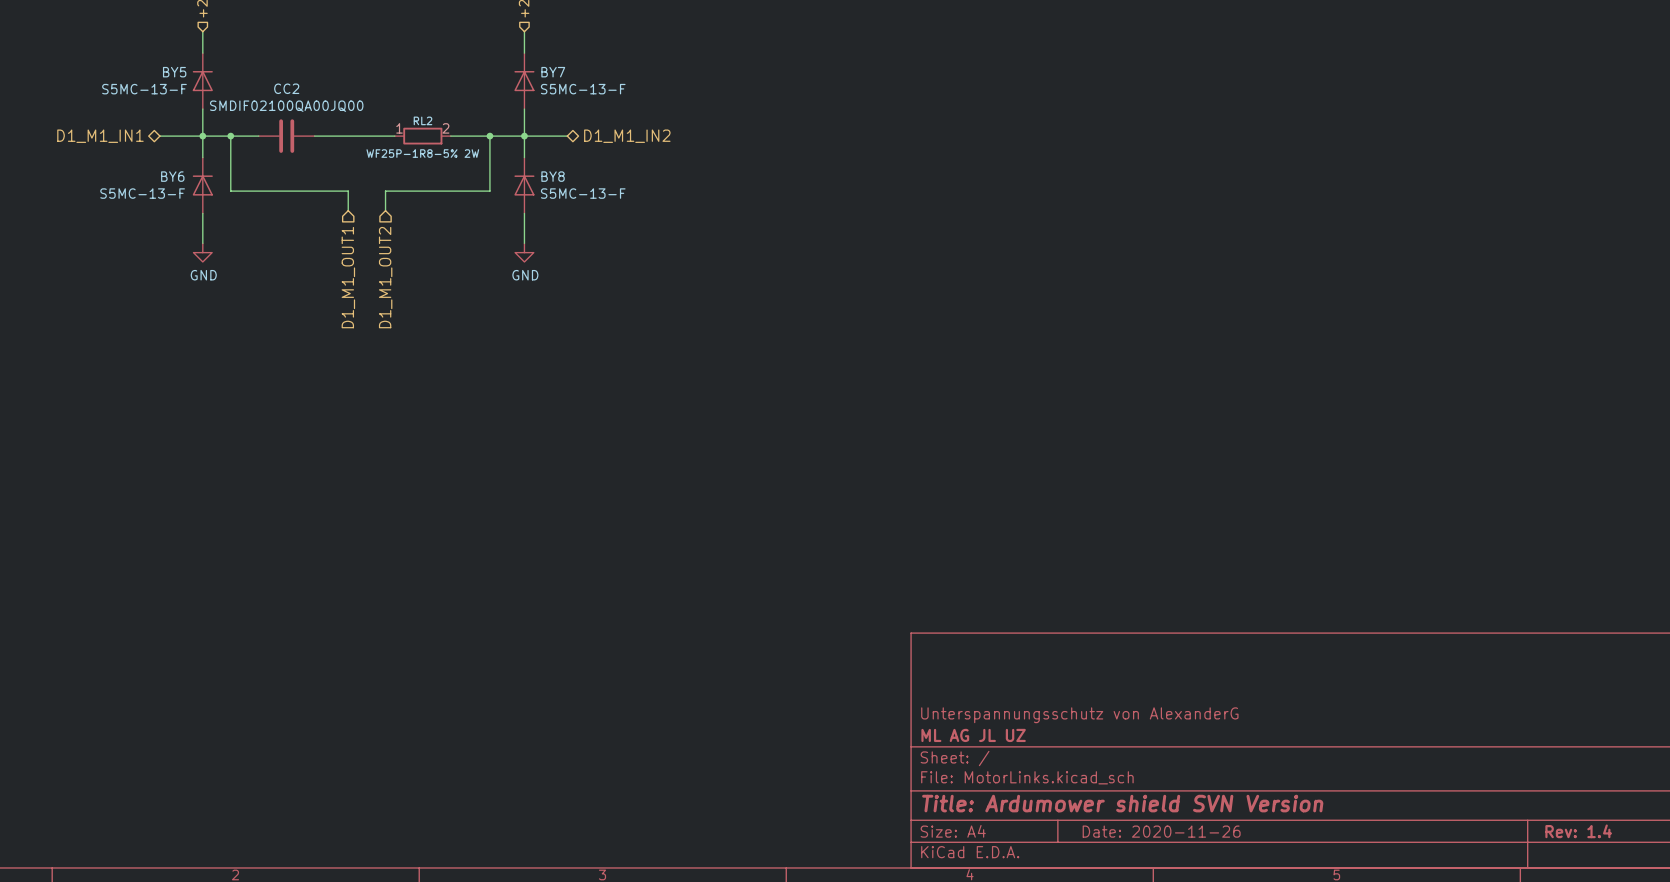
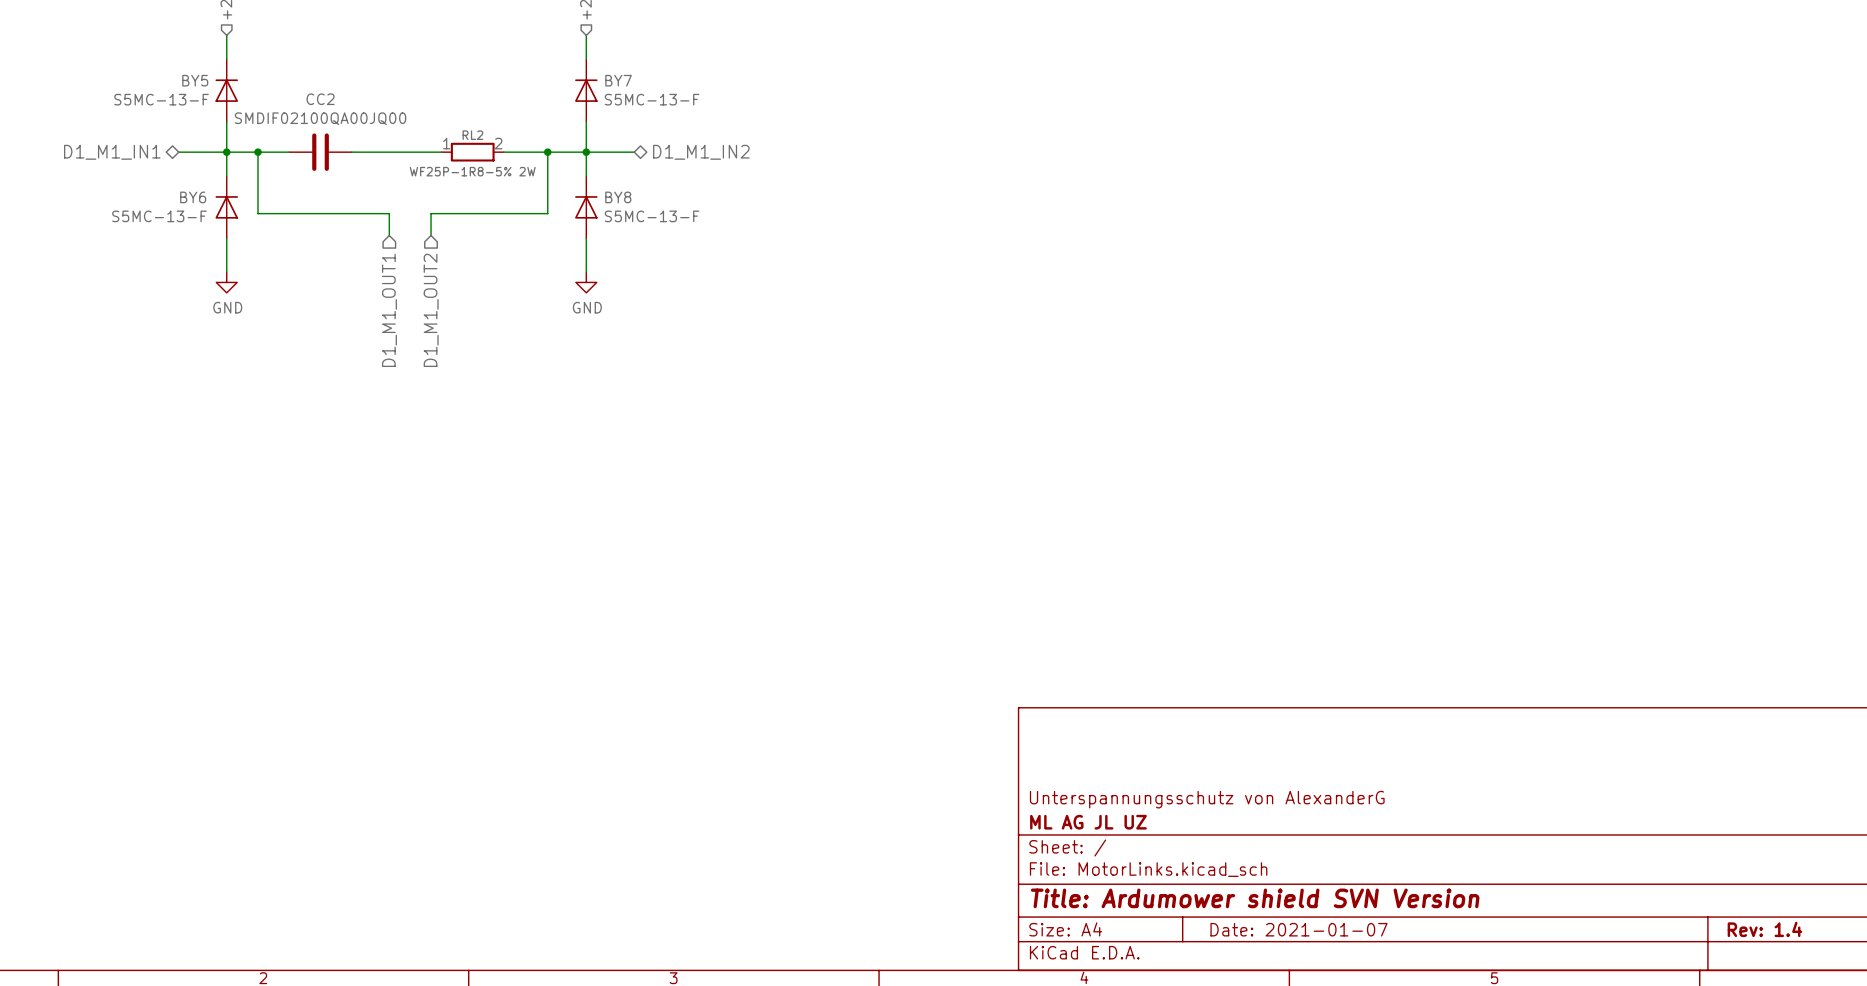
title block: Date: 2020-11-26 (1161, 831) -> Date: 2021-01-07 (1298, 929)

